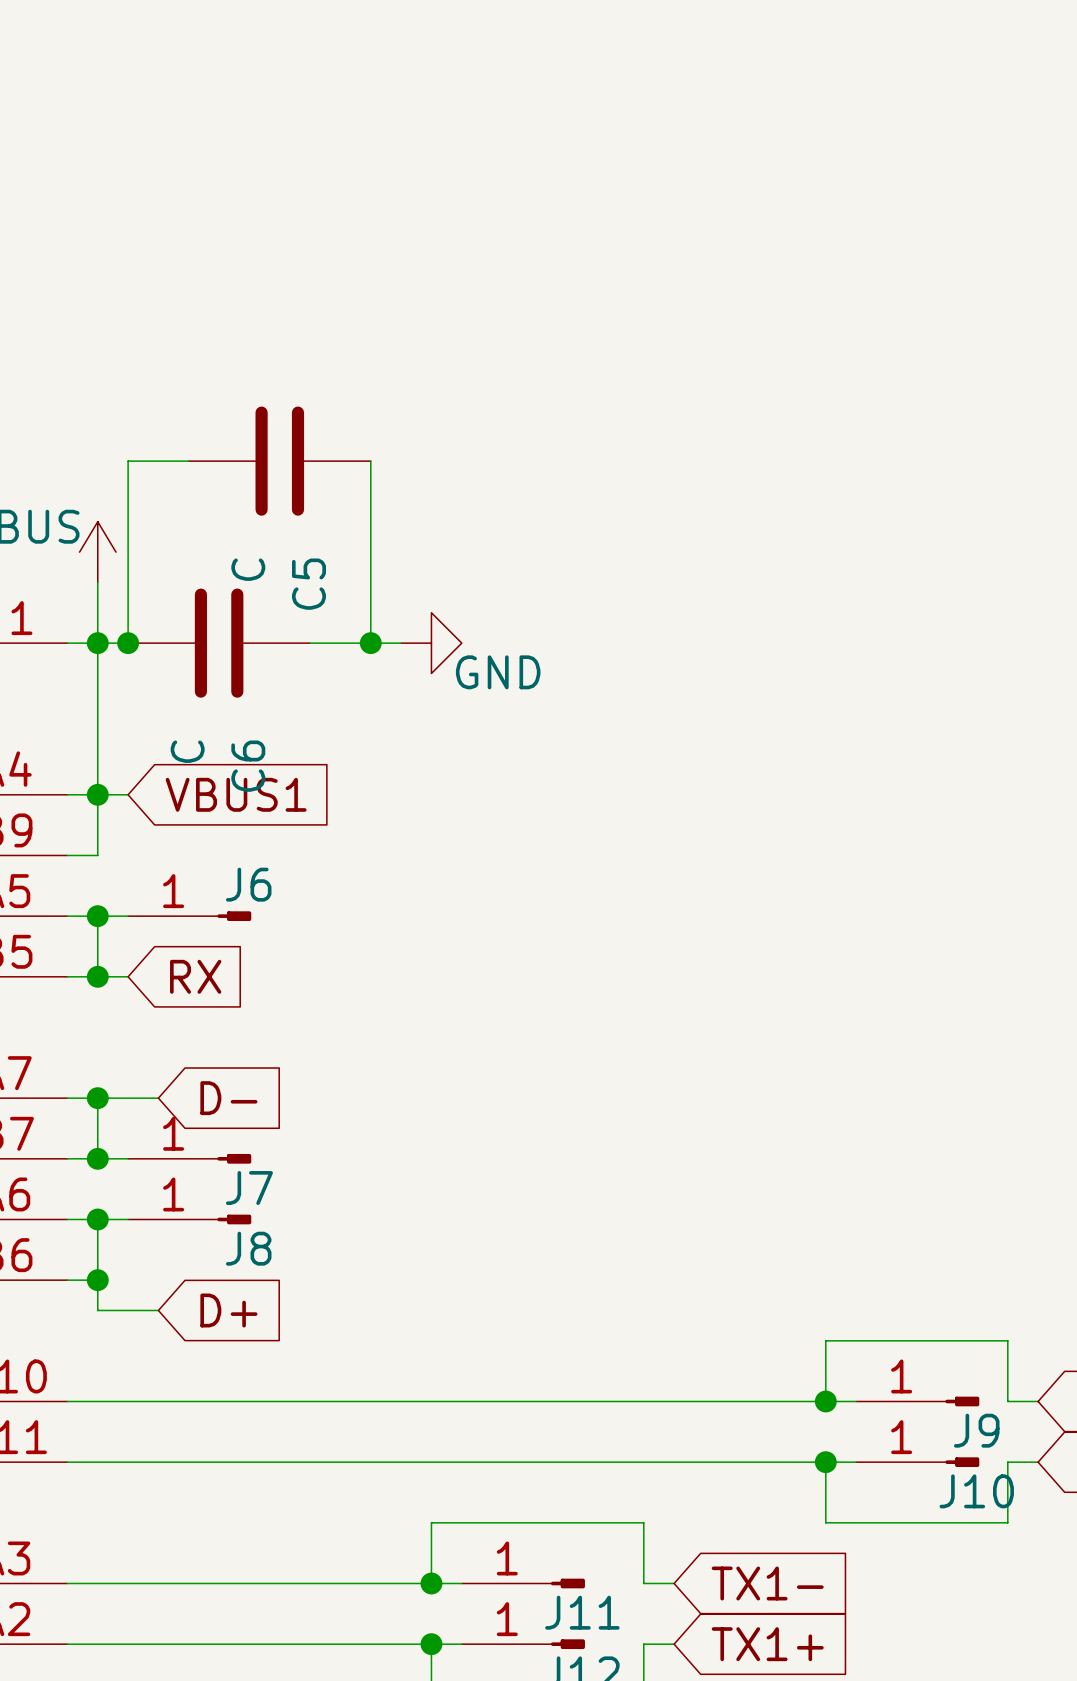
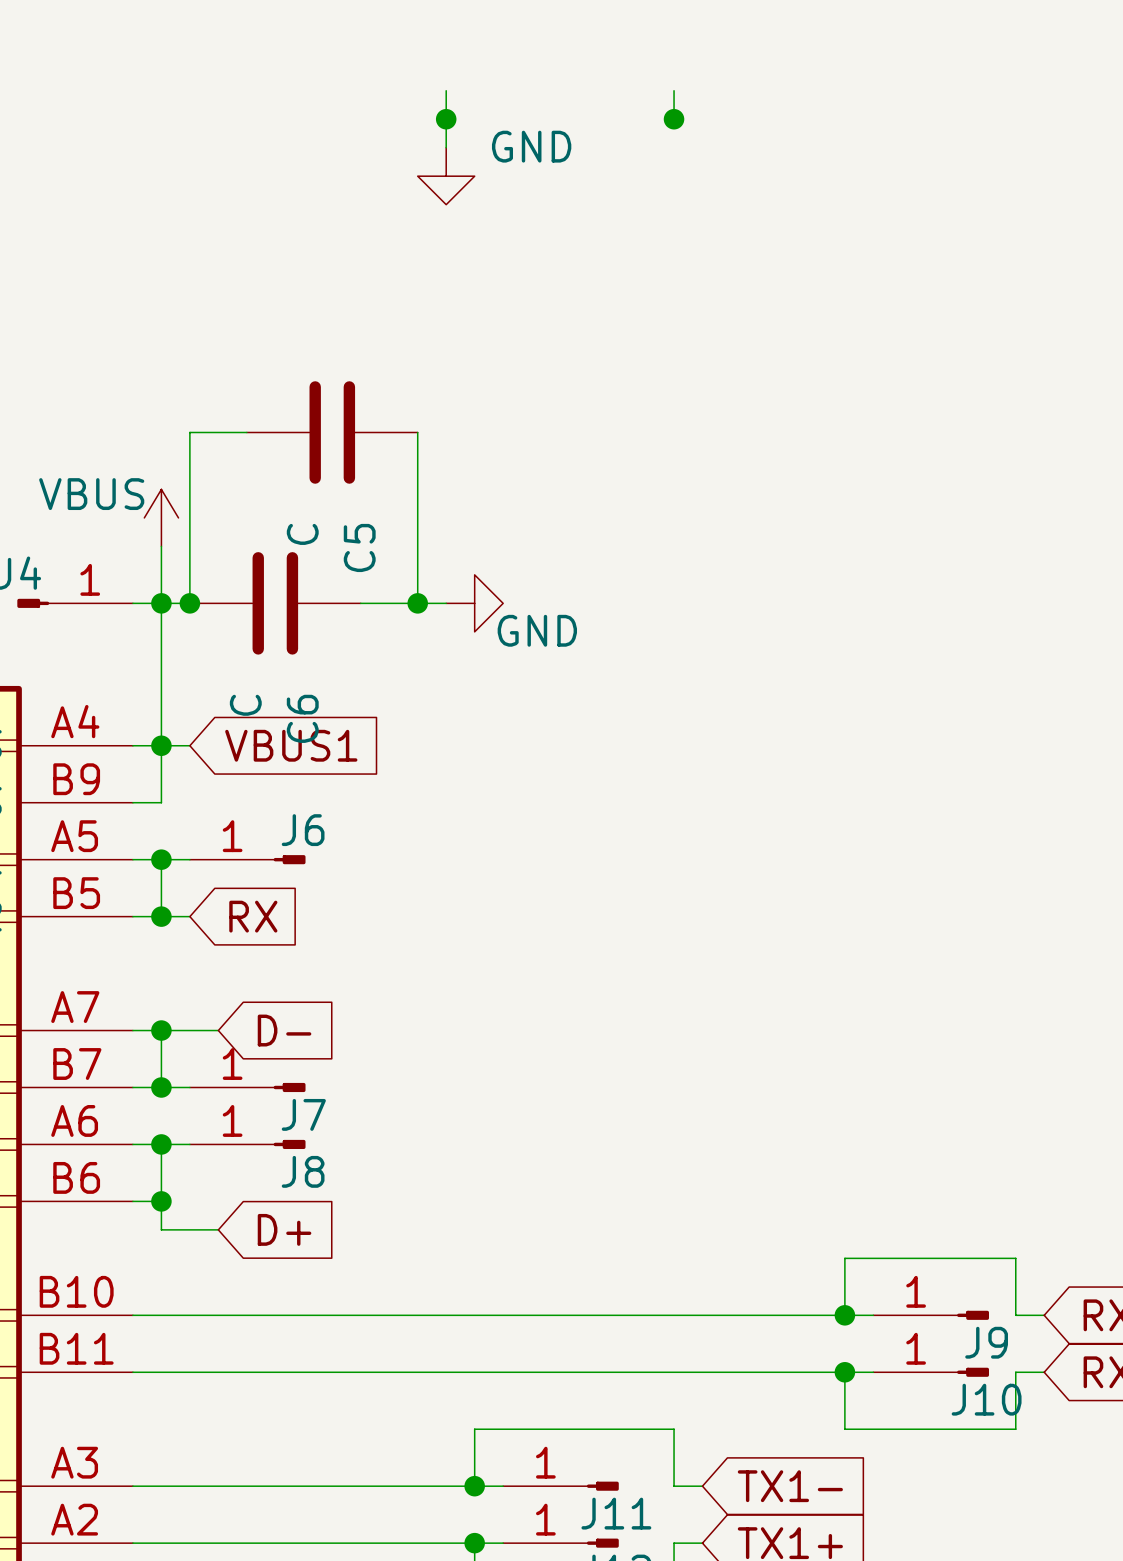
wire: none -> (446, 90) (446, 147)
wire: none -> (674, 90) (674, 119)
junction: none -> (446, 119)
junction: none -> (674, 119)
power symbol: none -> GND (446, 176)

